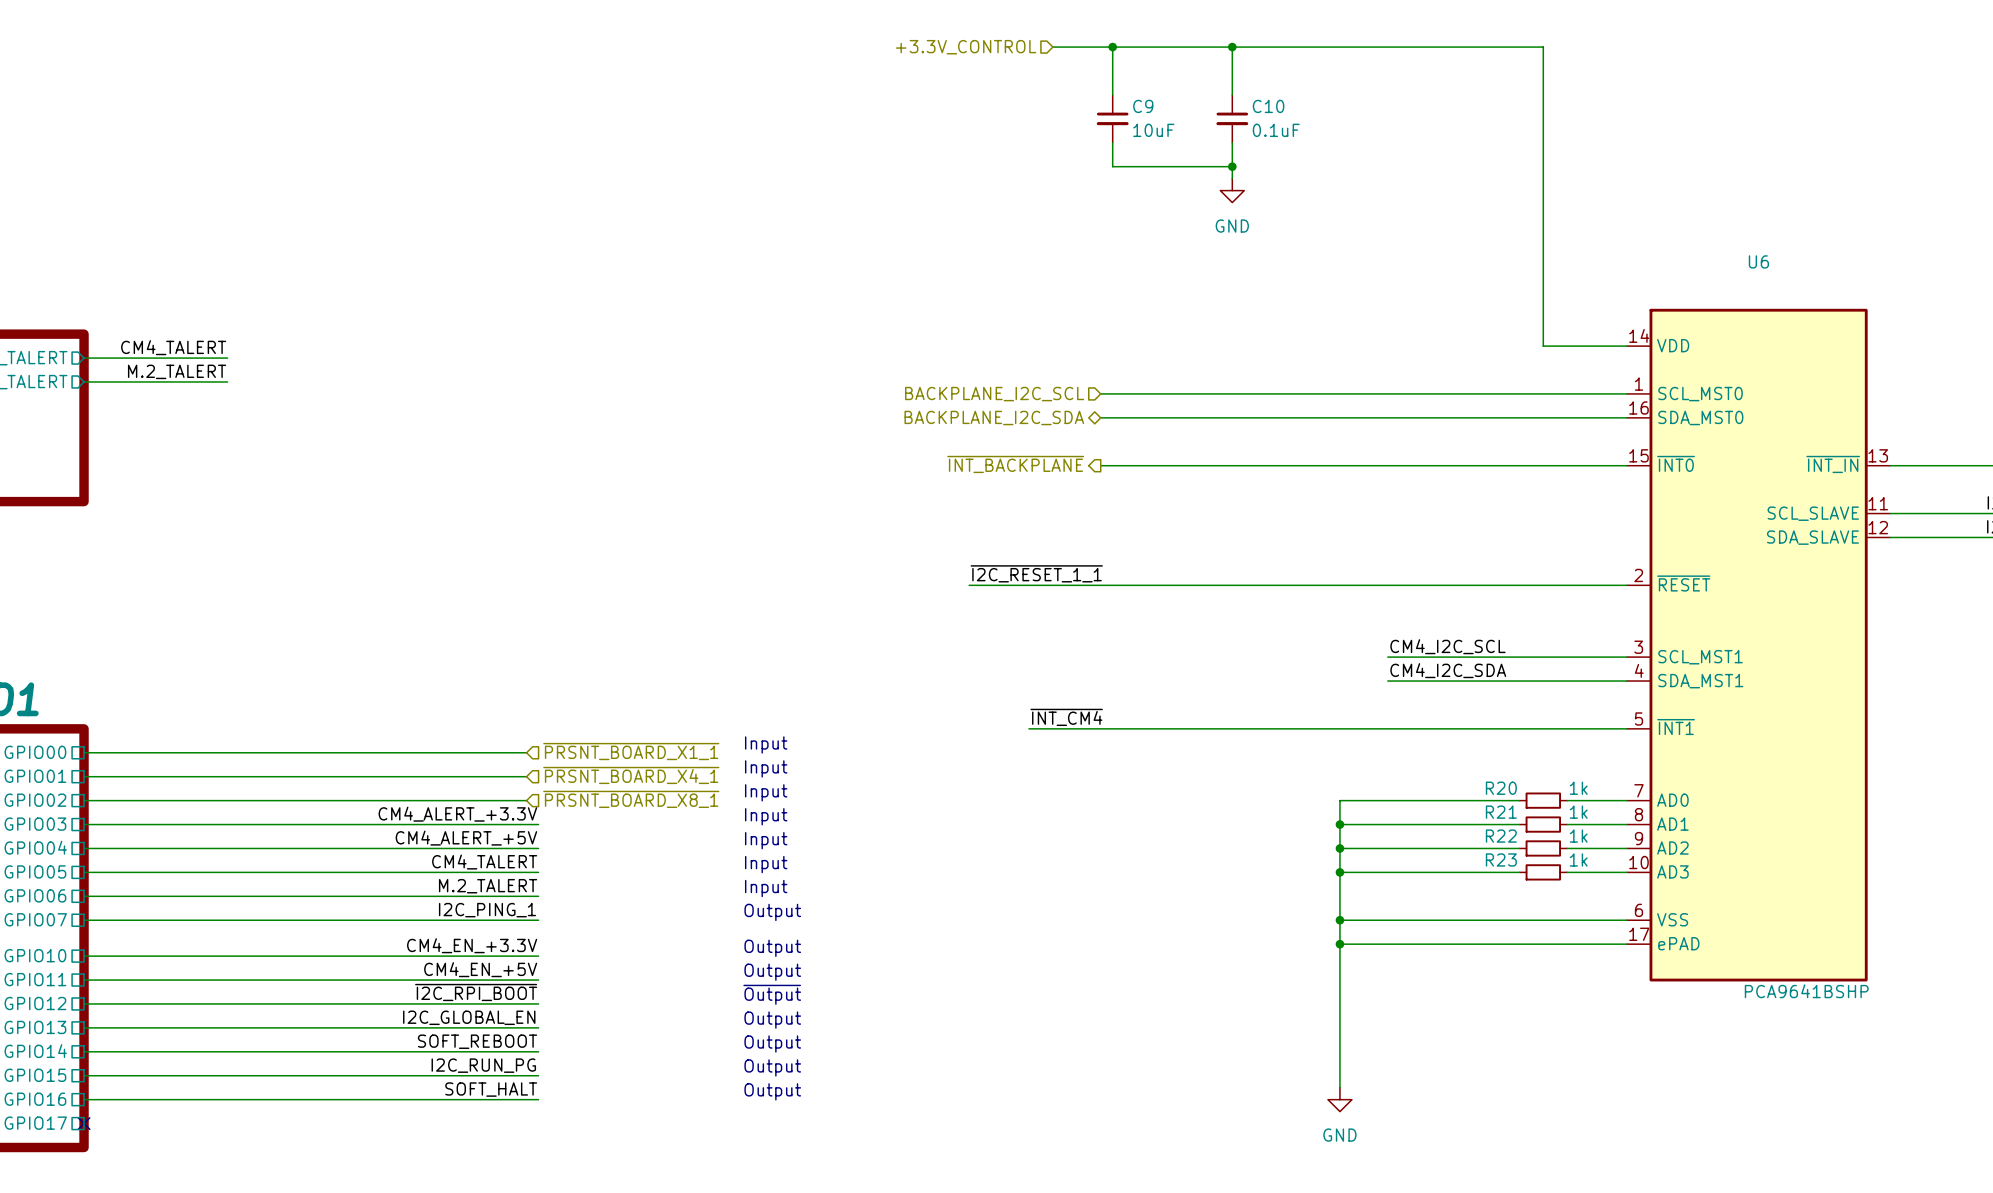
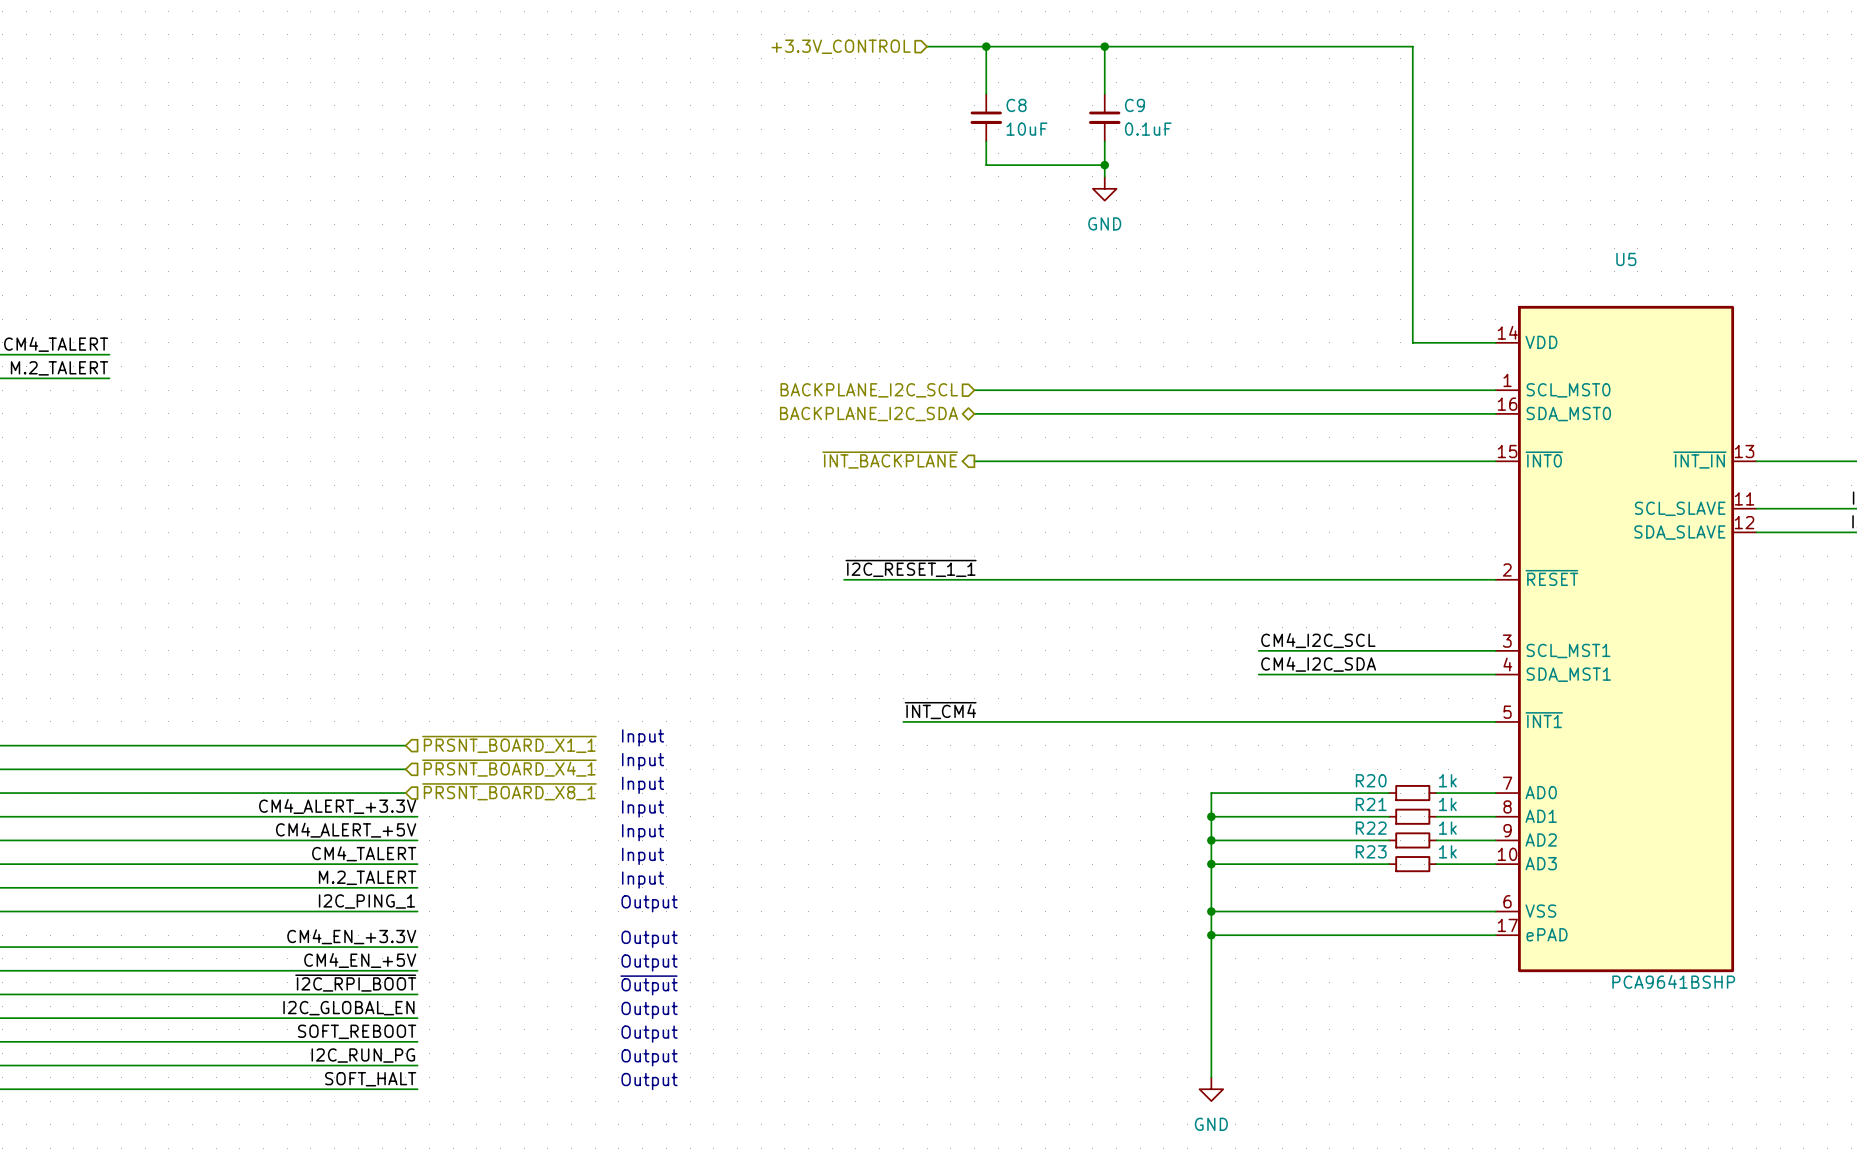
C9 name: C9 (1143, 106) -> C8 (1016, 105)
C10 name: C10 (1268, 106) -> C9 (1135, 105)
U6 name: U6 (1758, 261) -> U5 (1626, 259)

